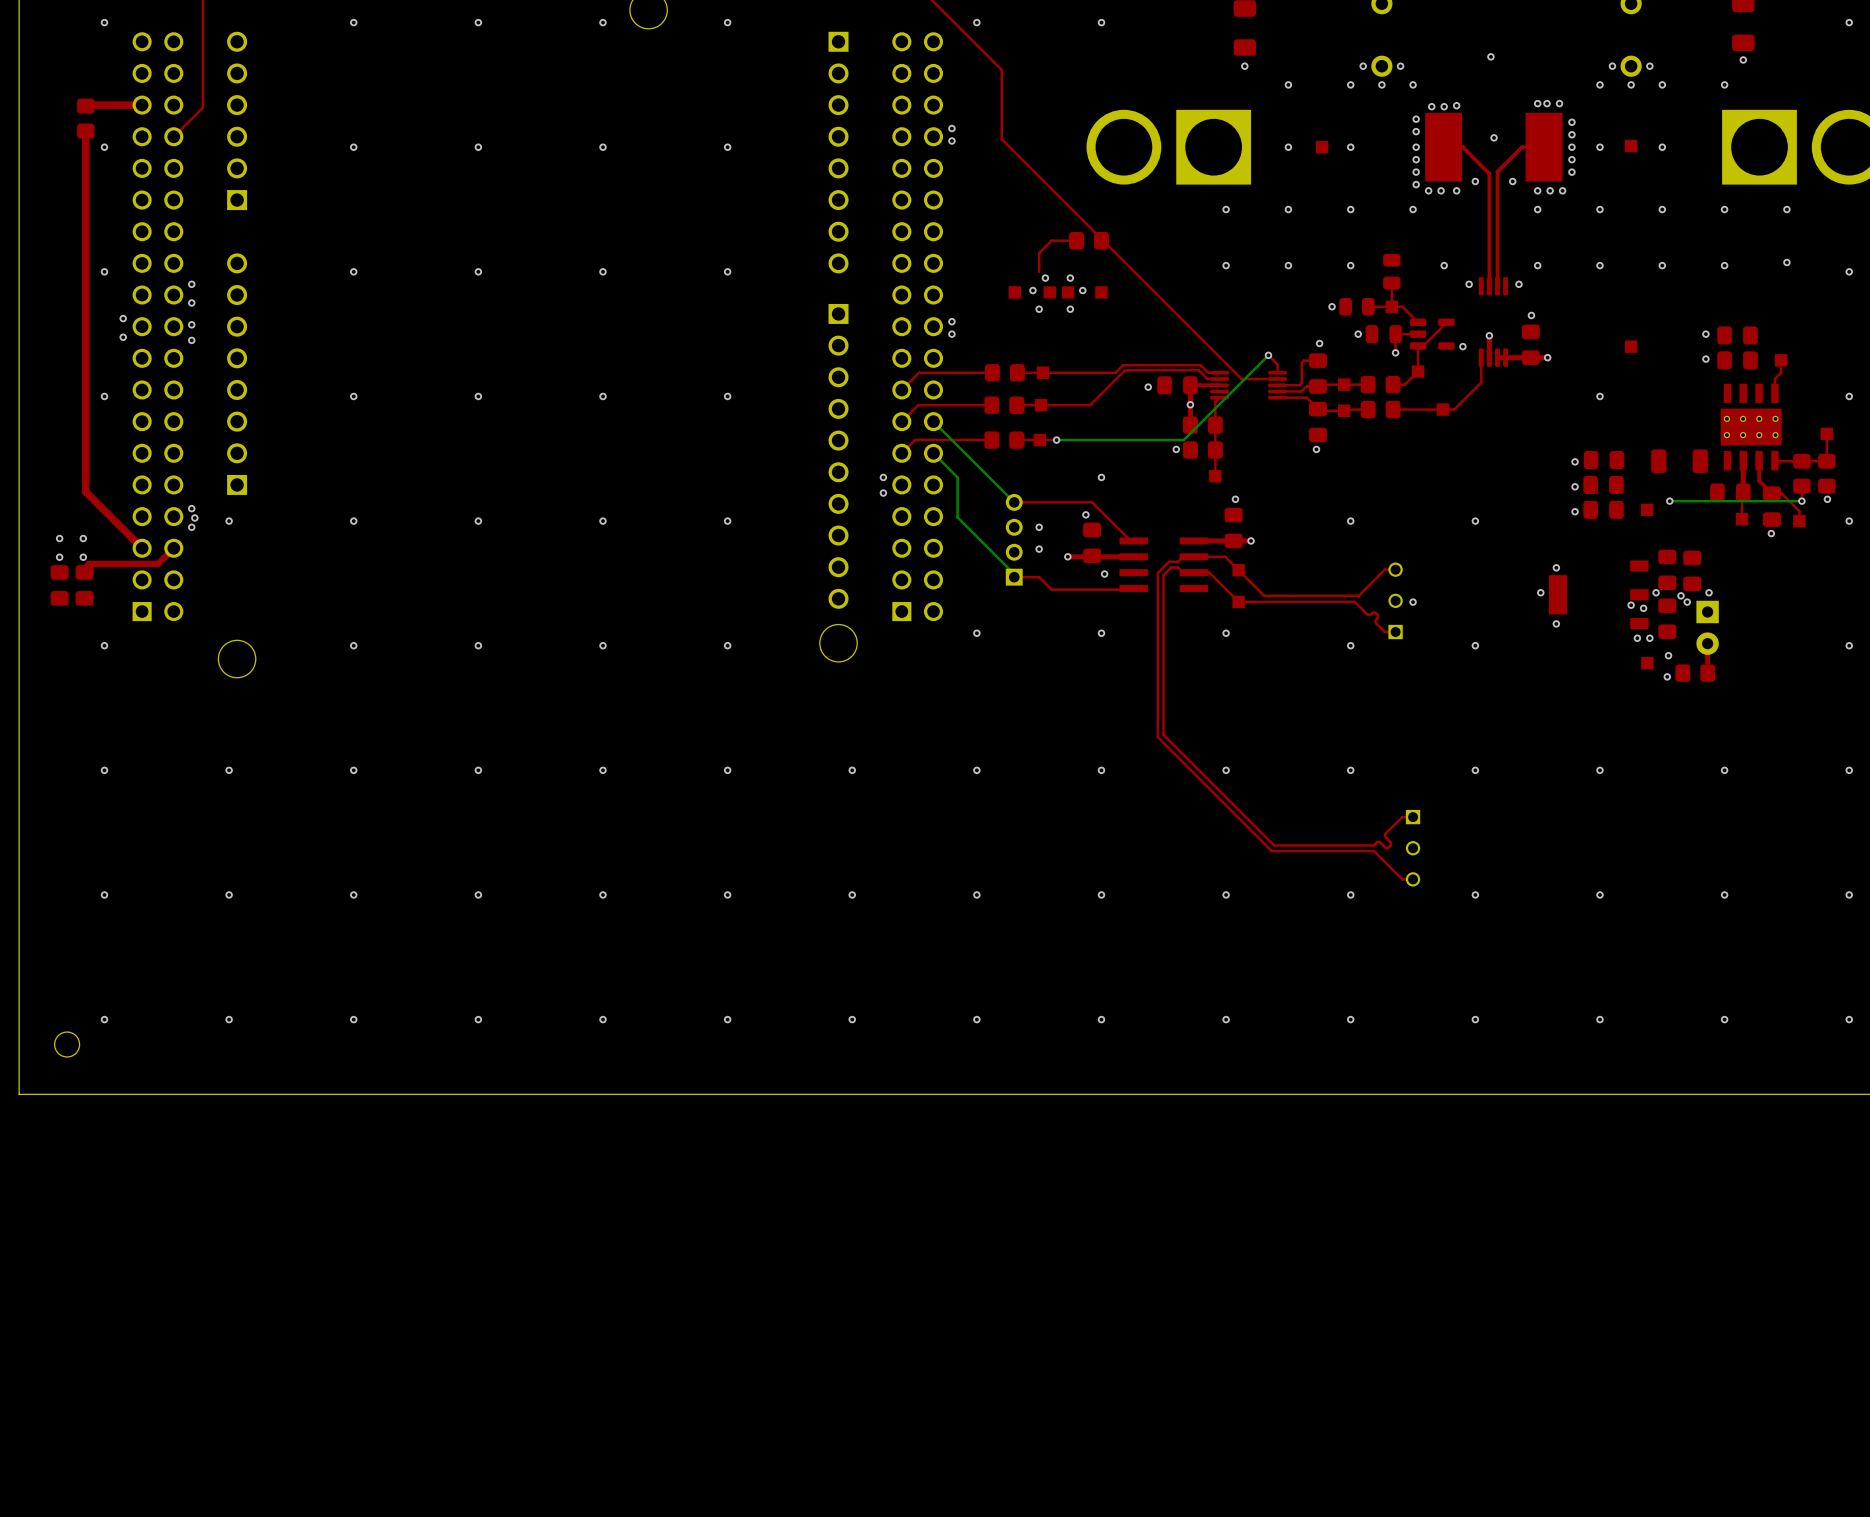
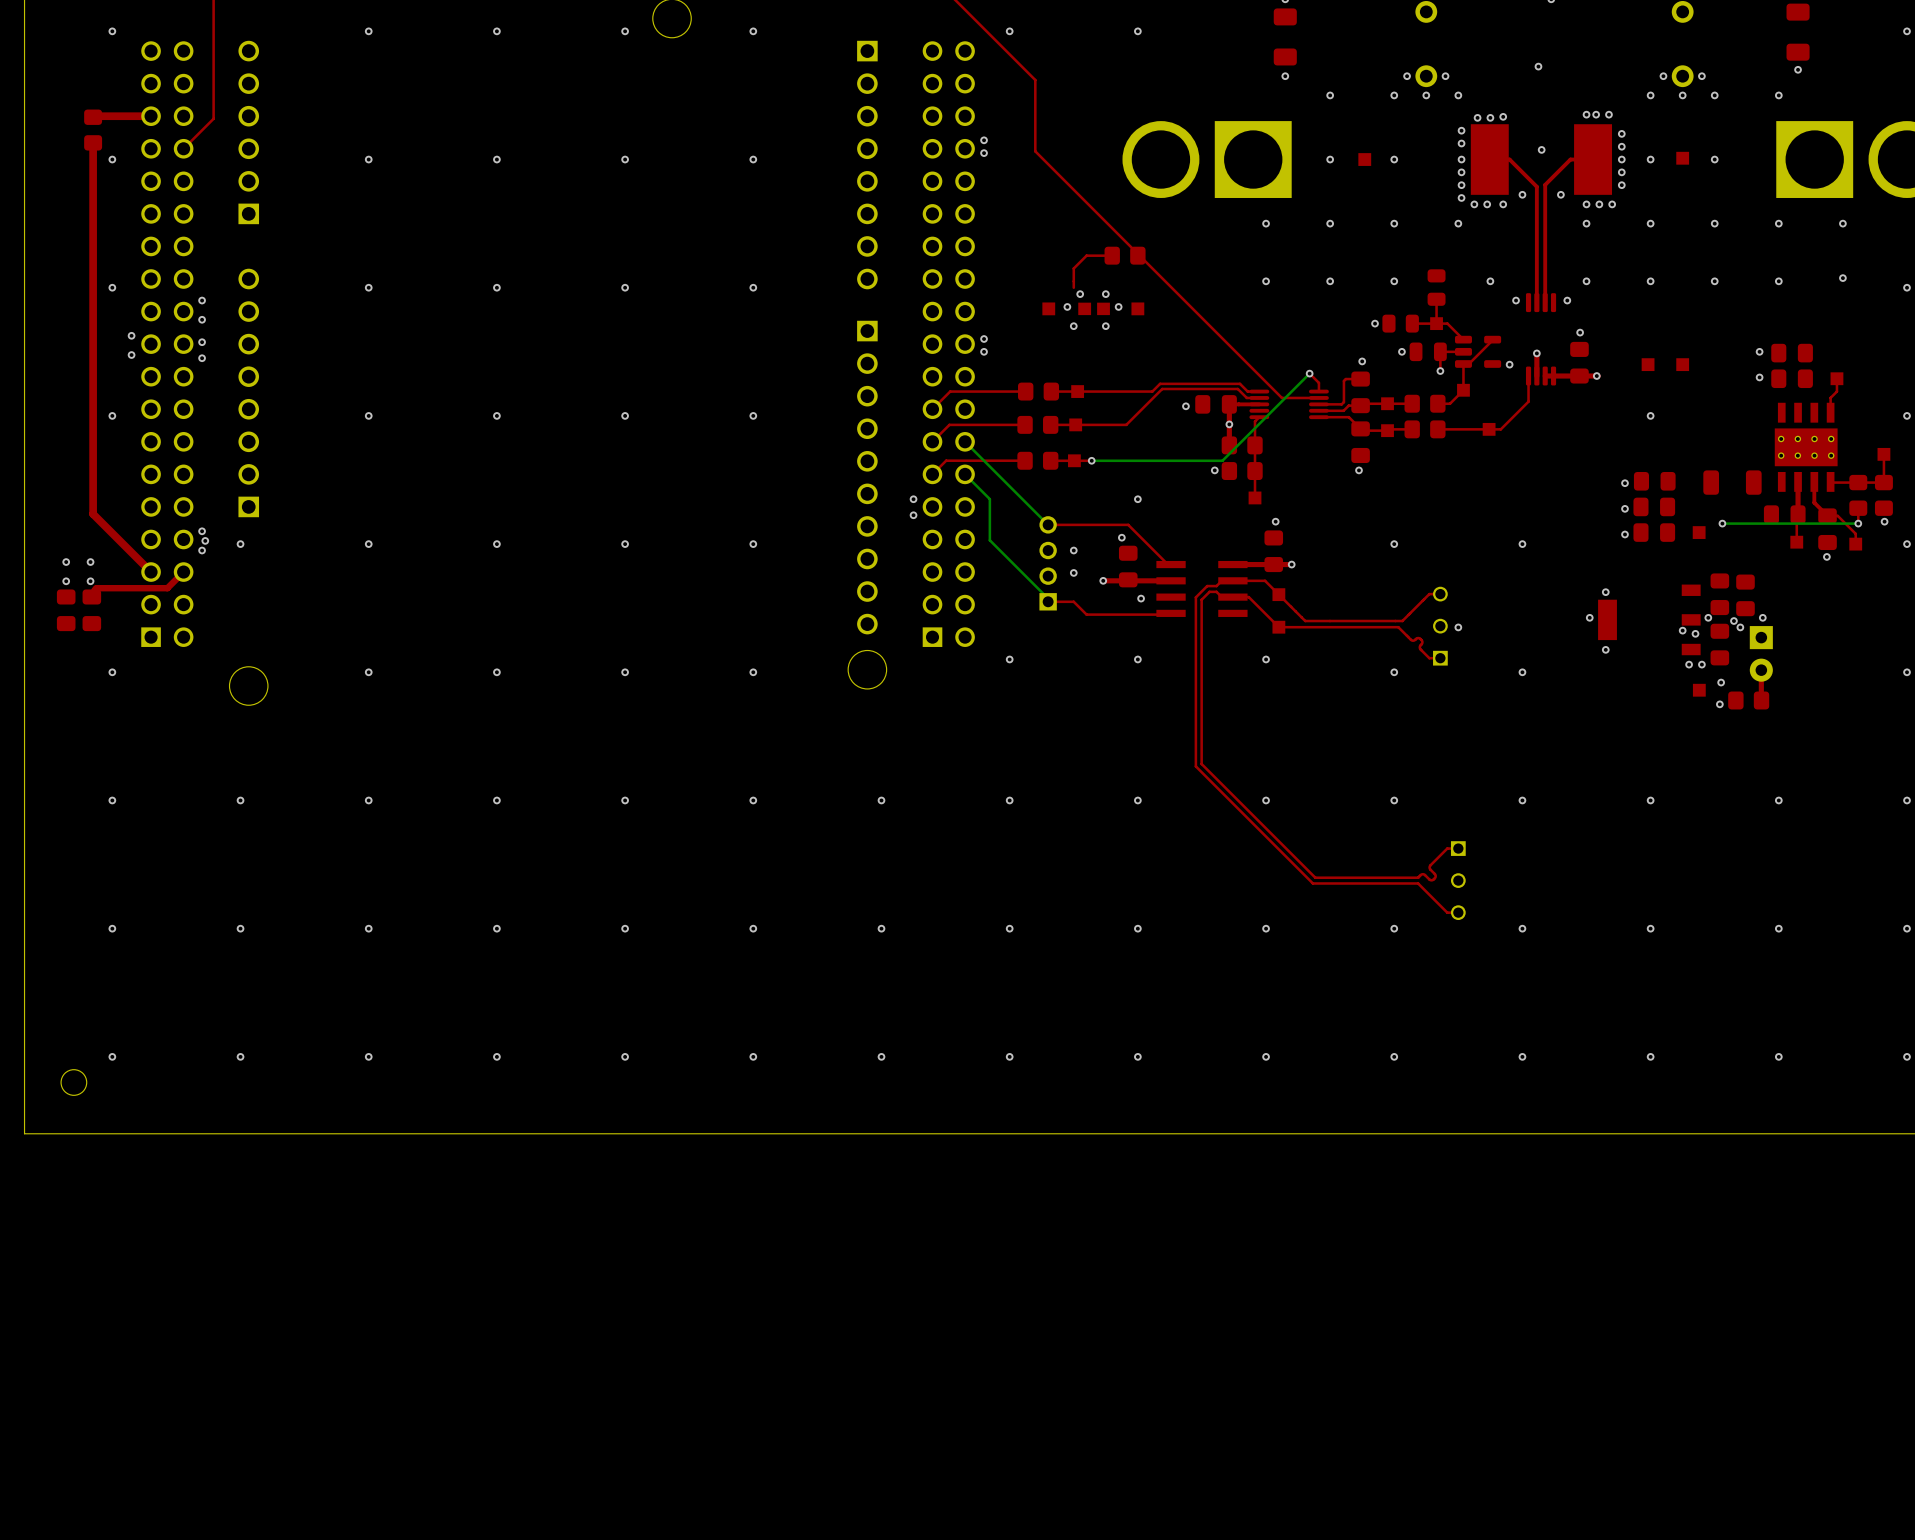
part: none -> (1648, 364)

